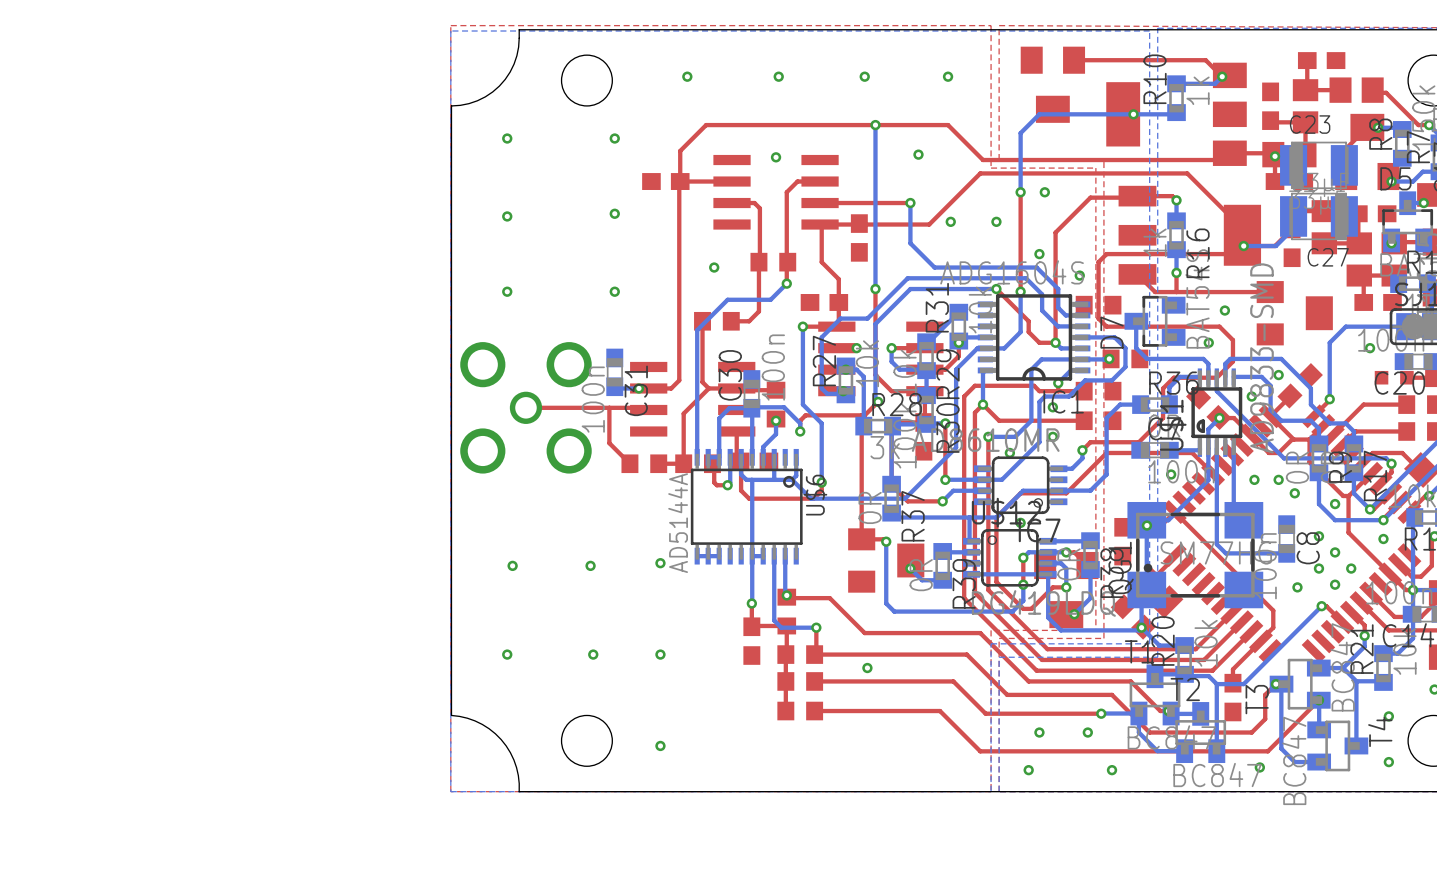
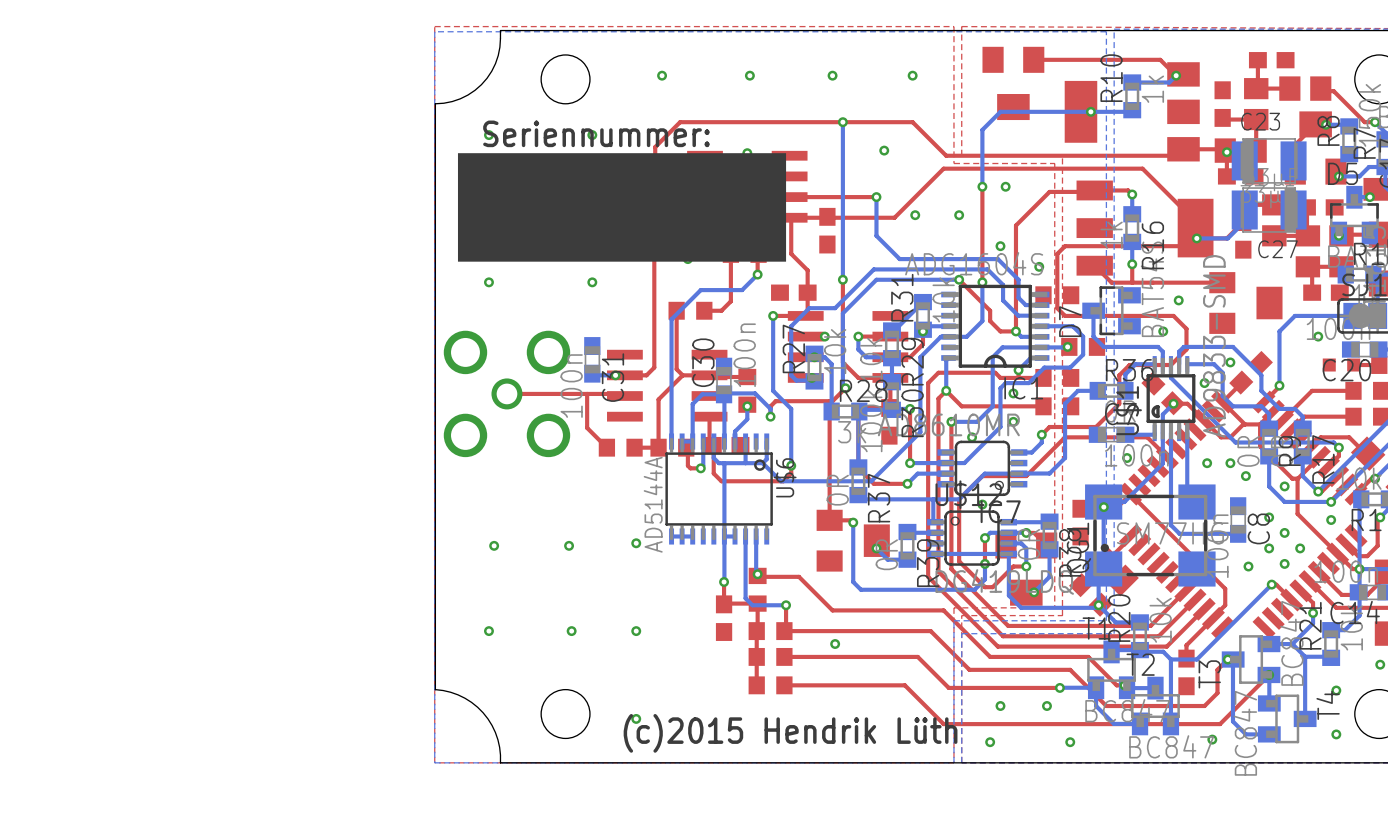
text: none -> Seriennummer: (596, 133)
drawing: none -> [457, 153, 787, 262]
text: none -> (c)2015 Hendrik Lüth (790, 733)

